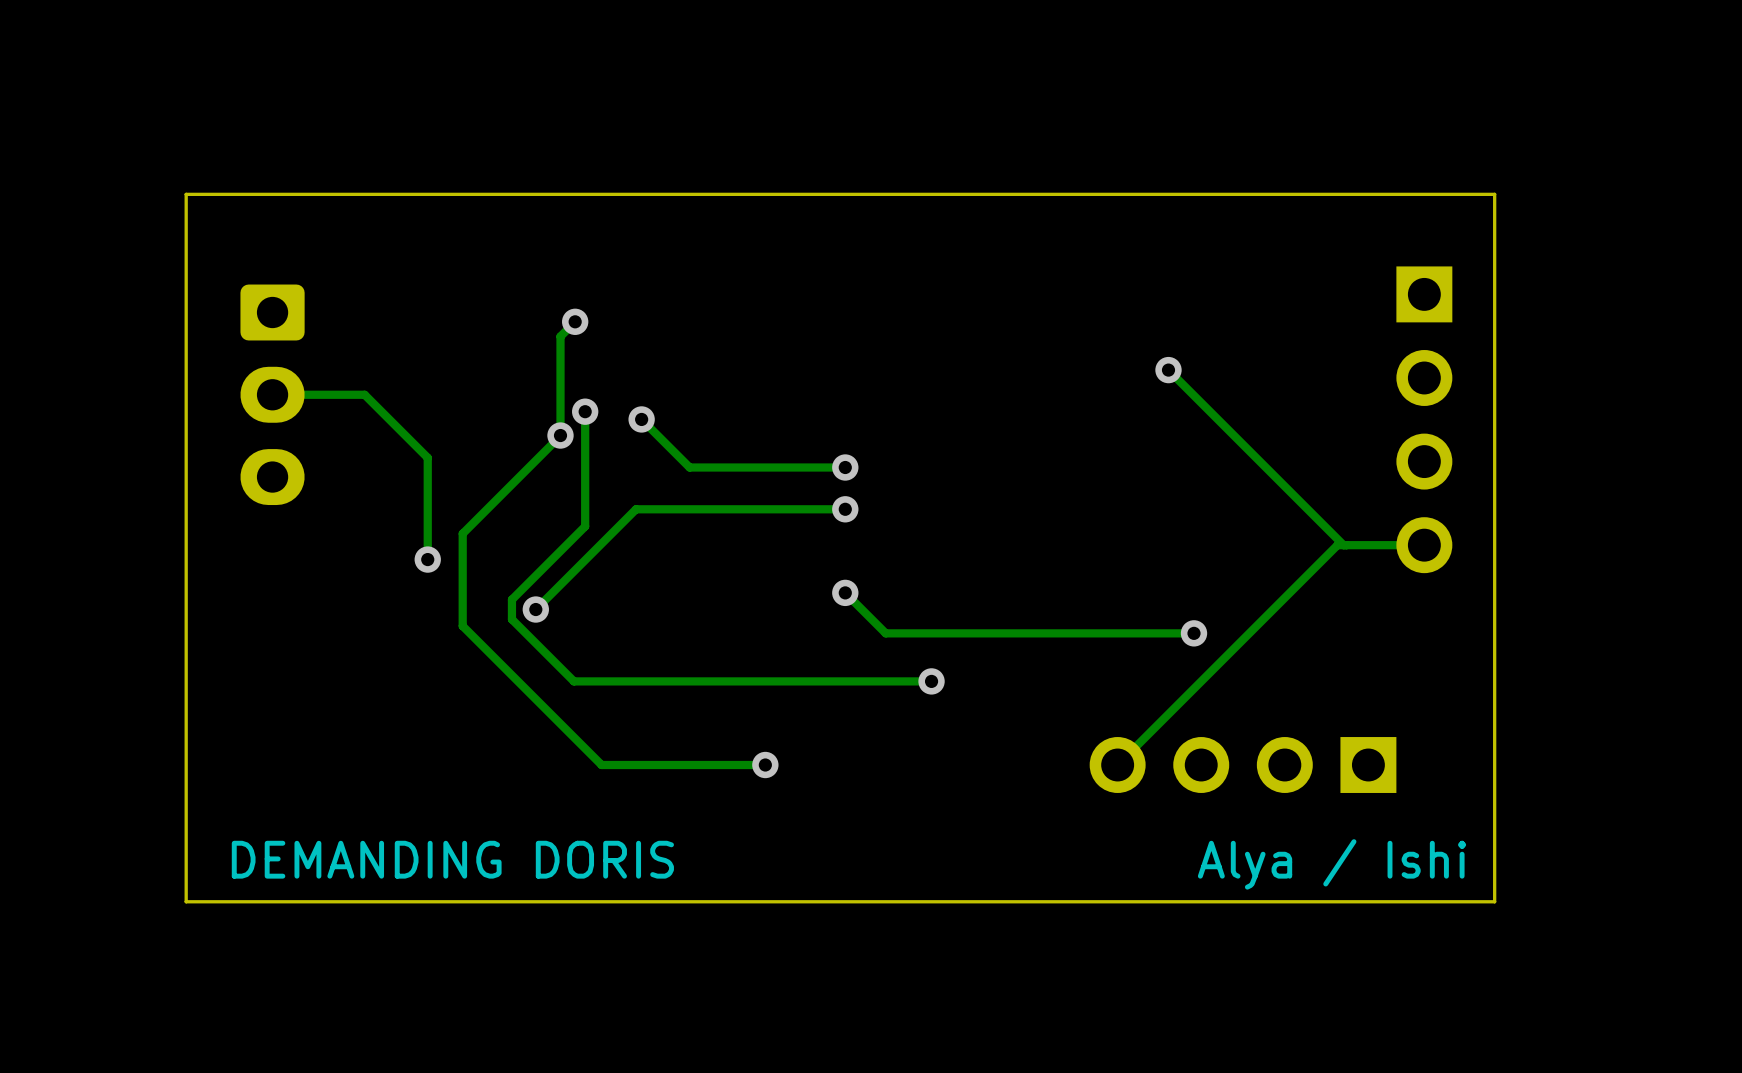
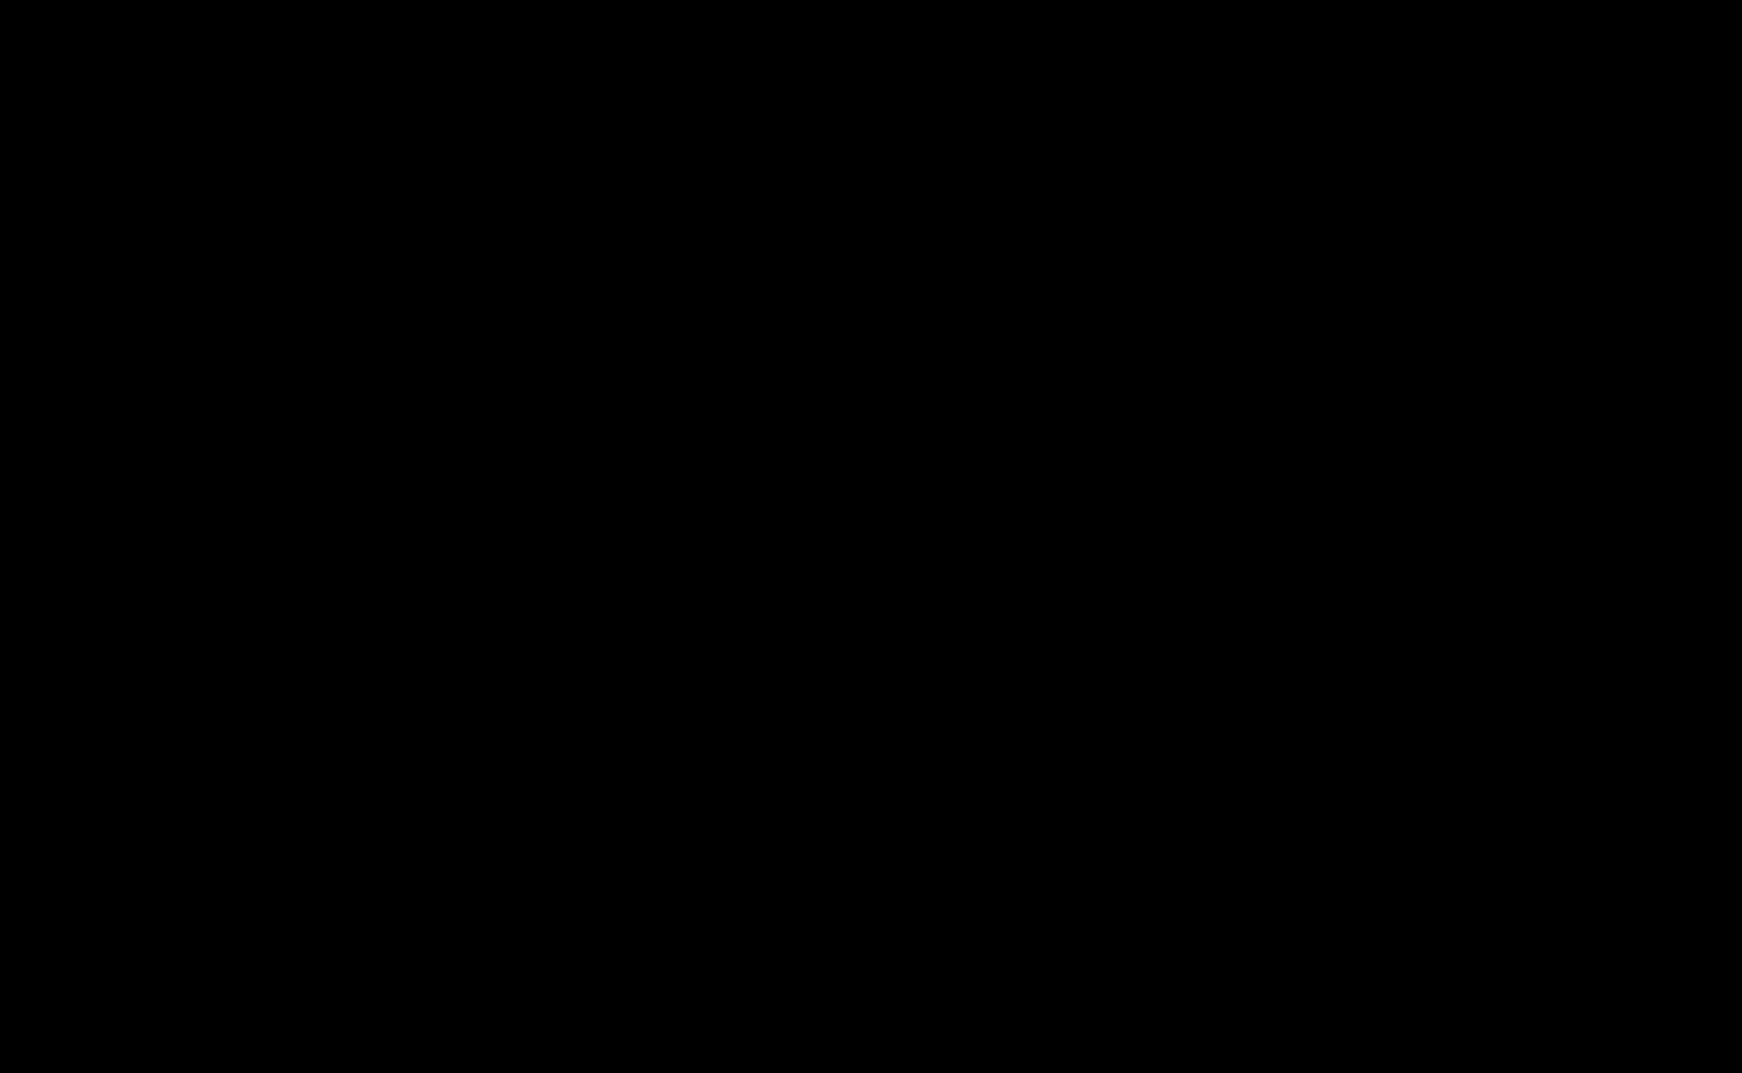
board edge: (1494, 194) (186, 194) (186, 901) (1494, 901) (1494, 194) -> none
track: (575, 321) (560, 336) (560, 435) (462, 533) (462, 626) (601, 765) (765, 765) -> none
via: (575, 321) -> none
track: (1168, 370) (1343, 545) -> none
via: (1168, 370) -> none
track: (272, 394) (364, 394) (427, 457) (427, 559) -> none
part: (272, 394) -> none
track: (585, 411) (585, 526) (511, 599) (511, 619) (573, 681) (931, 681) -> none
via: (585, 411) -> none
track: (641, 419) (689, 467) (845, 467) -> none
via: (641, 419) -> none
part: (1424, 419) -> none
via: (560, 435) -> none
via: (845, 467) -> none
track: (845, 509) (636, 509) (535, 609) -> none
via: (845, 509) -> none
track: (1424, 545) (1337, 545) (1117, 765) -> none
via: (427, 559) -> none
track: (845, 592) (885, 633) (1194, 633) -> none
via: (845, 592) -> none
via: (535, 609) -> none
via: (1194, 633) -> none
via: (931, 681) -> none
via: (765, 765) -> none
part: (1243, 765) -> none
text: DEMANDING DORIS (452, 859) -> none
text: Alya / Ishi (1332, 864) -> none

